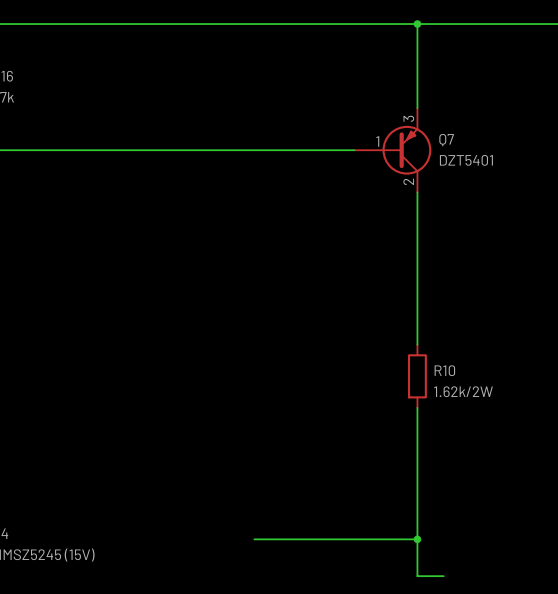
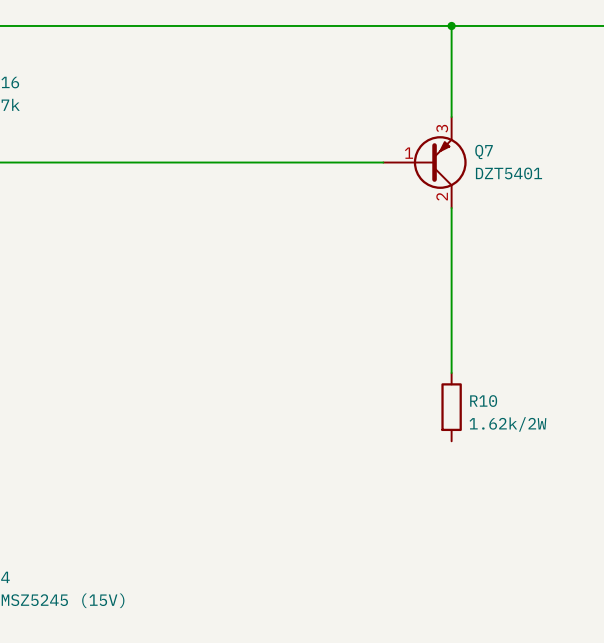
wire: (417, 407) (417, 576) (443, 576) -> none
wire: (254, 539) (417, 539) -> none
junction: (417, 539) -> none

